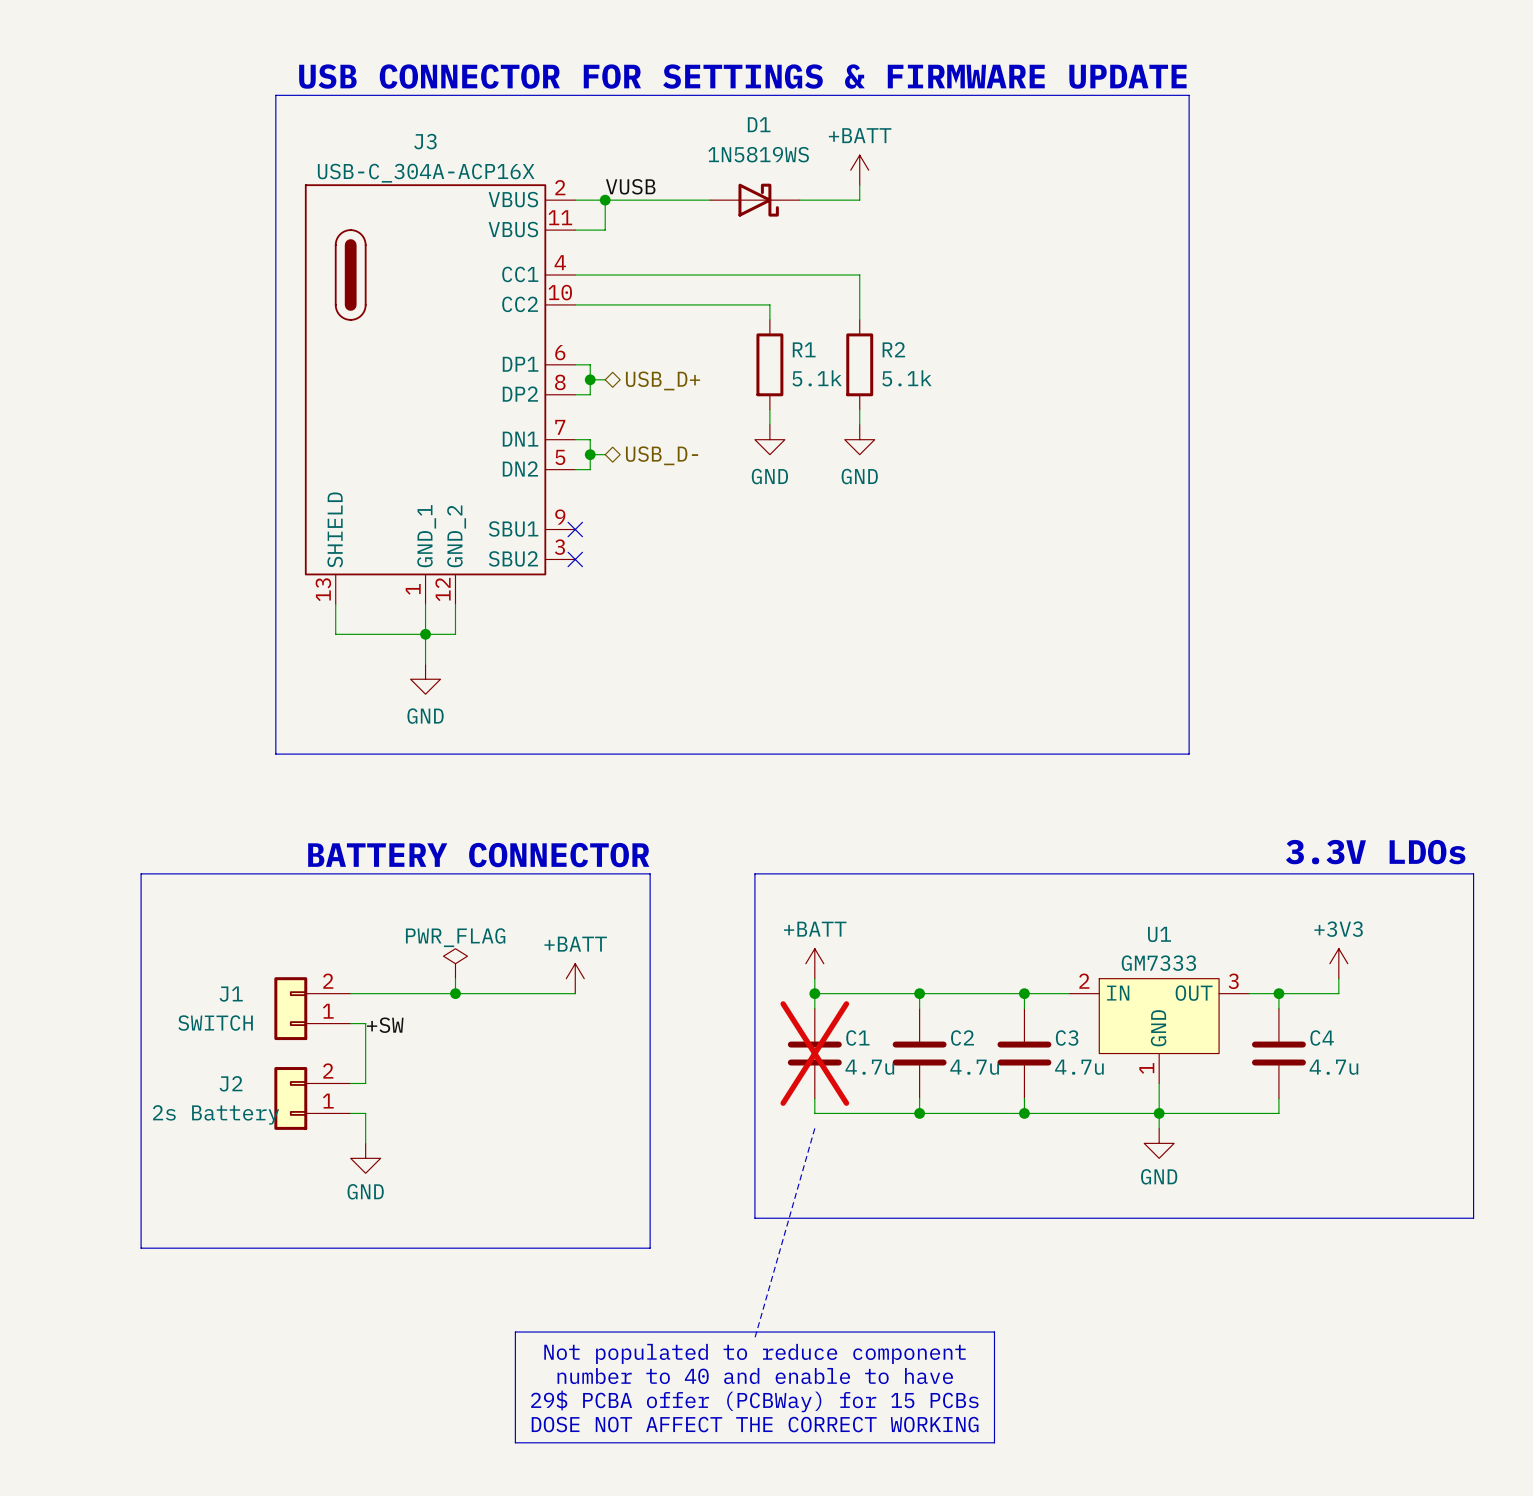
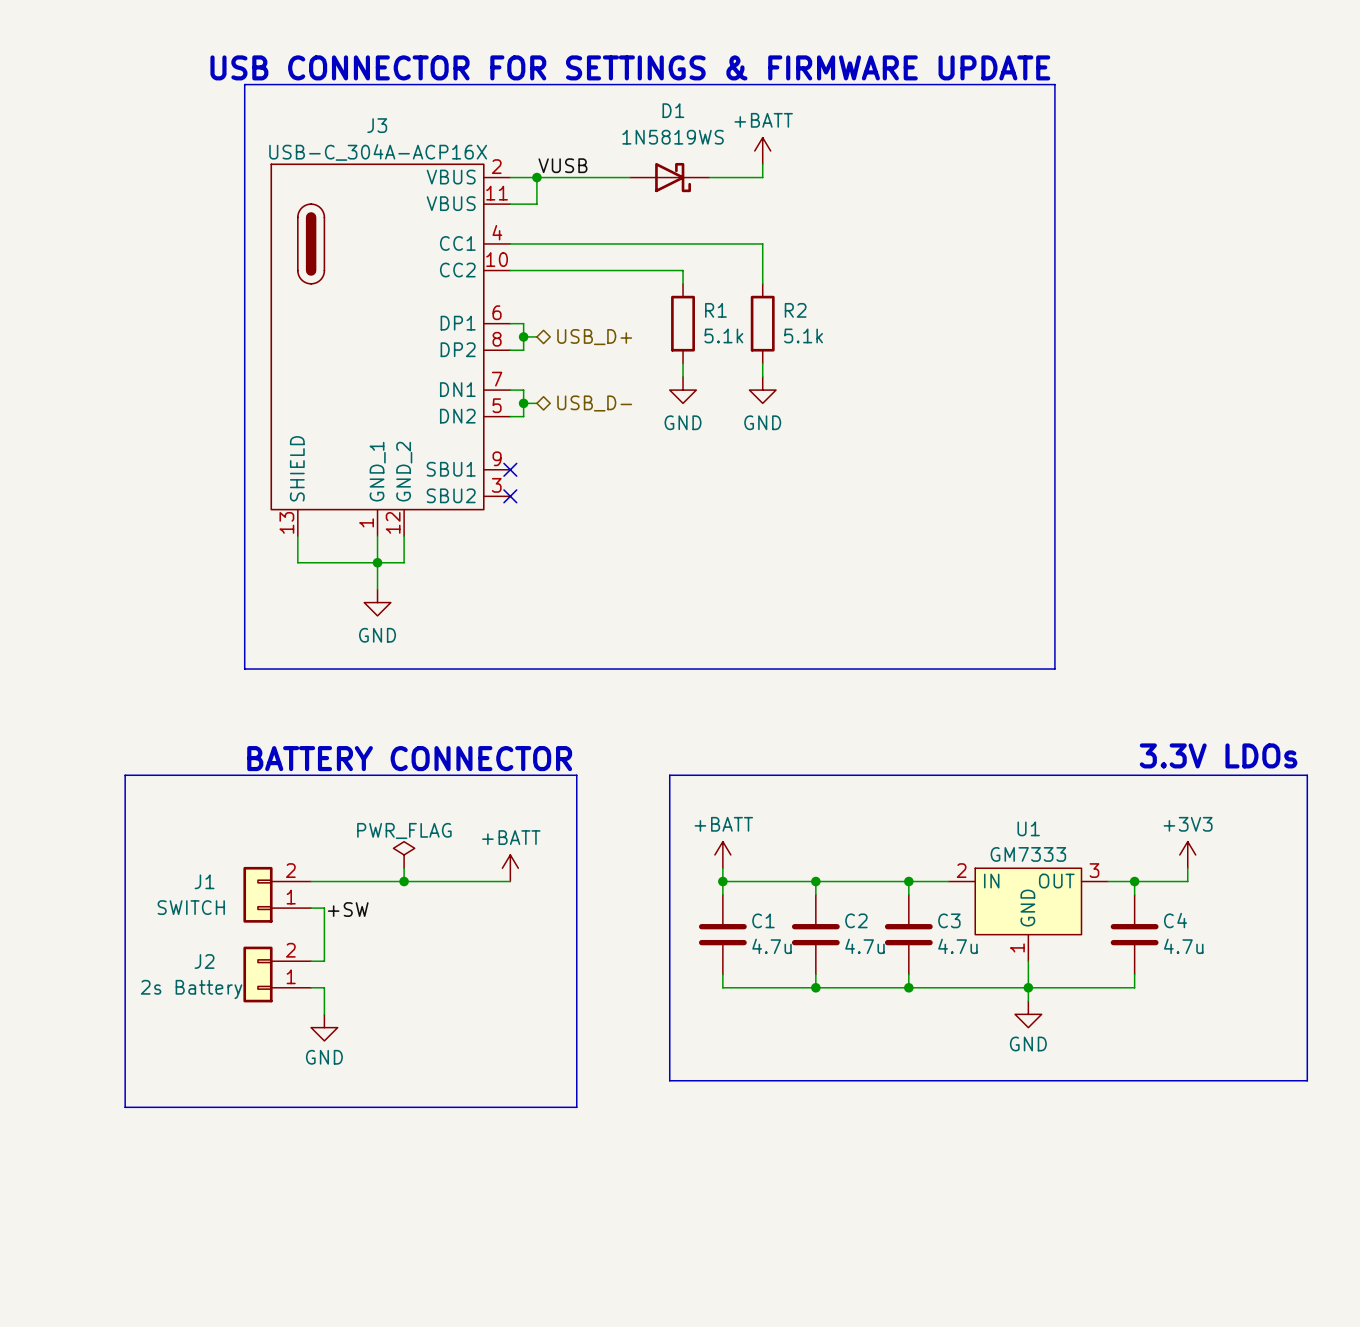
C1 do-not-place cross: (814, 1053) -> none
line: (814, 1128) (754, 1338) -> none
line: (515, 1332) (994, 1332) (994, 1442) (515, 1442) (515, 1332) -> none
text: Not populated to reduce component (754, 1353) -> none
text: number to 40 and enable to have (755, 1376) -> none
text: 29$ PCBA offer (PCBWay) for 15 PCBs (754, 1401) -> none
text: DOSE NOT AFFECT THE CORRECT WORKING (755, 1424) -> none

